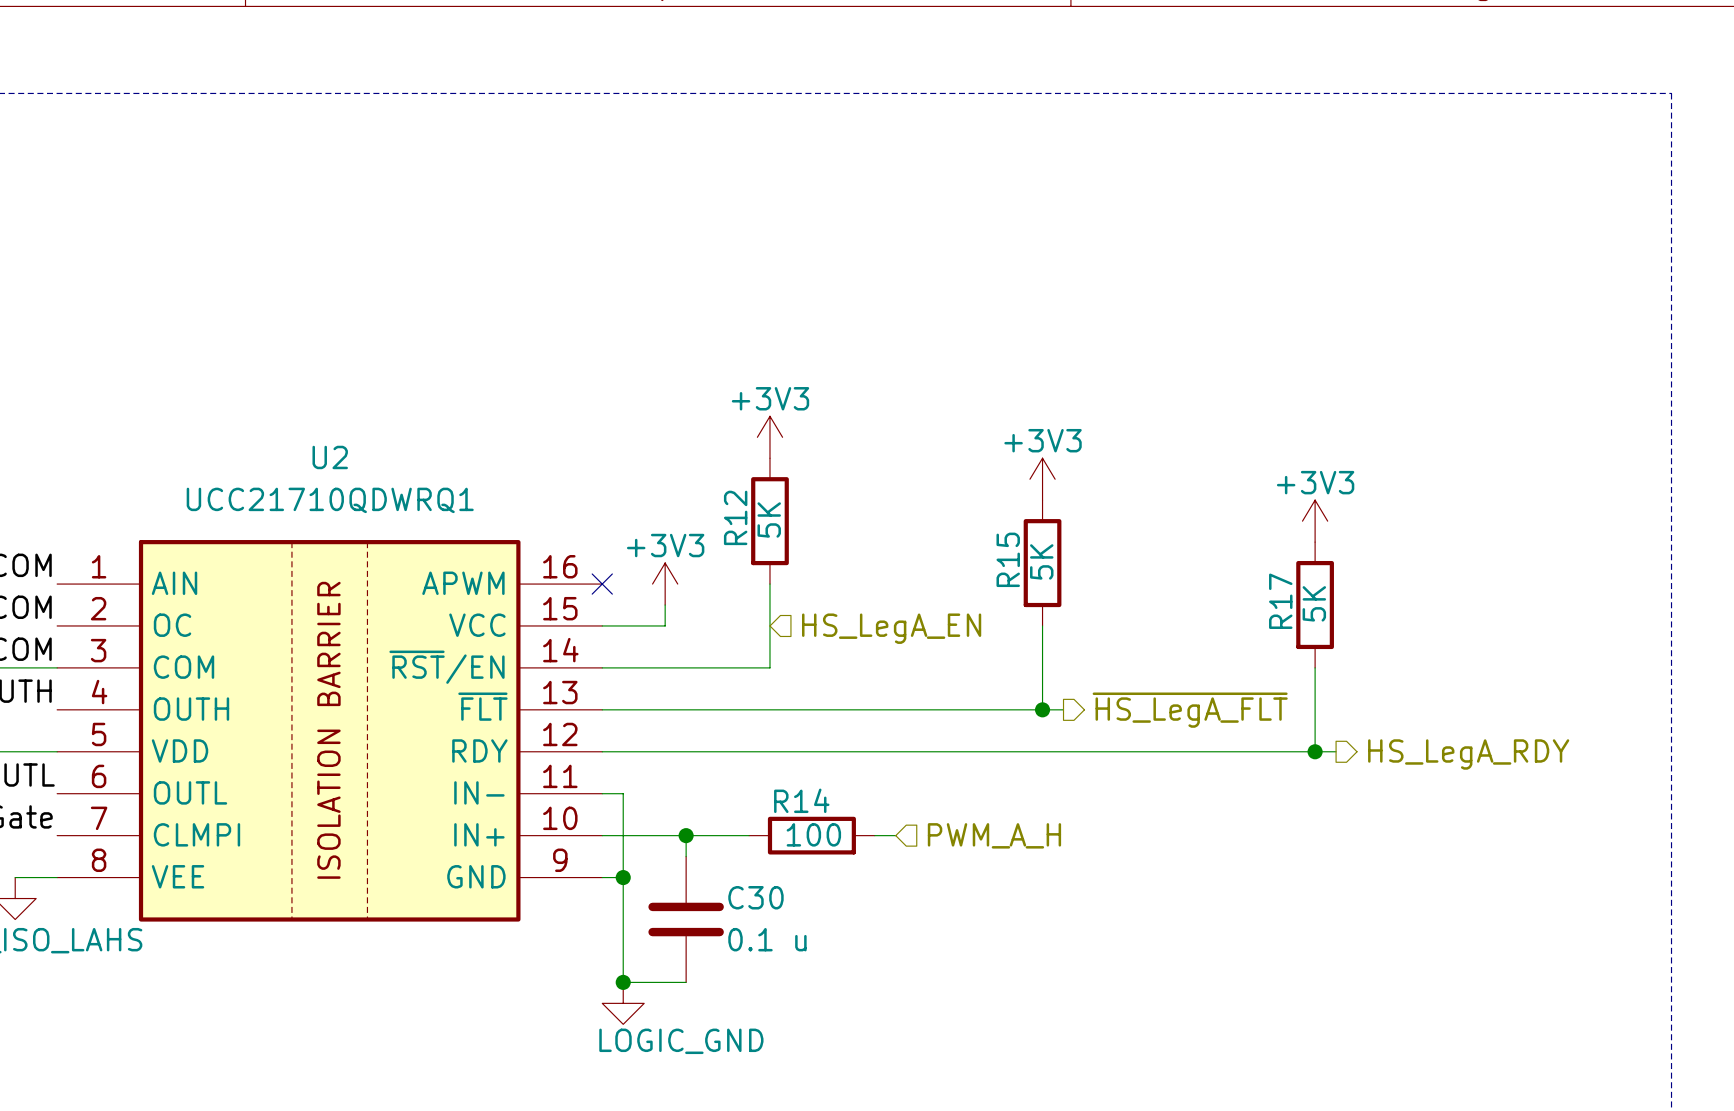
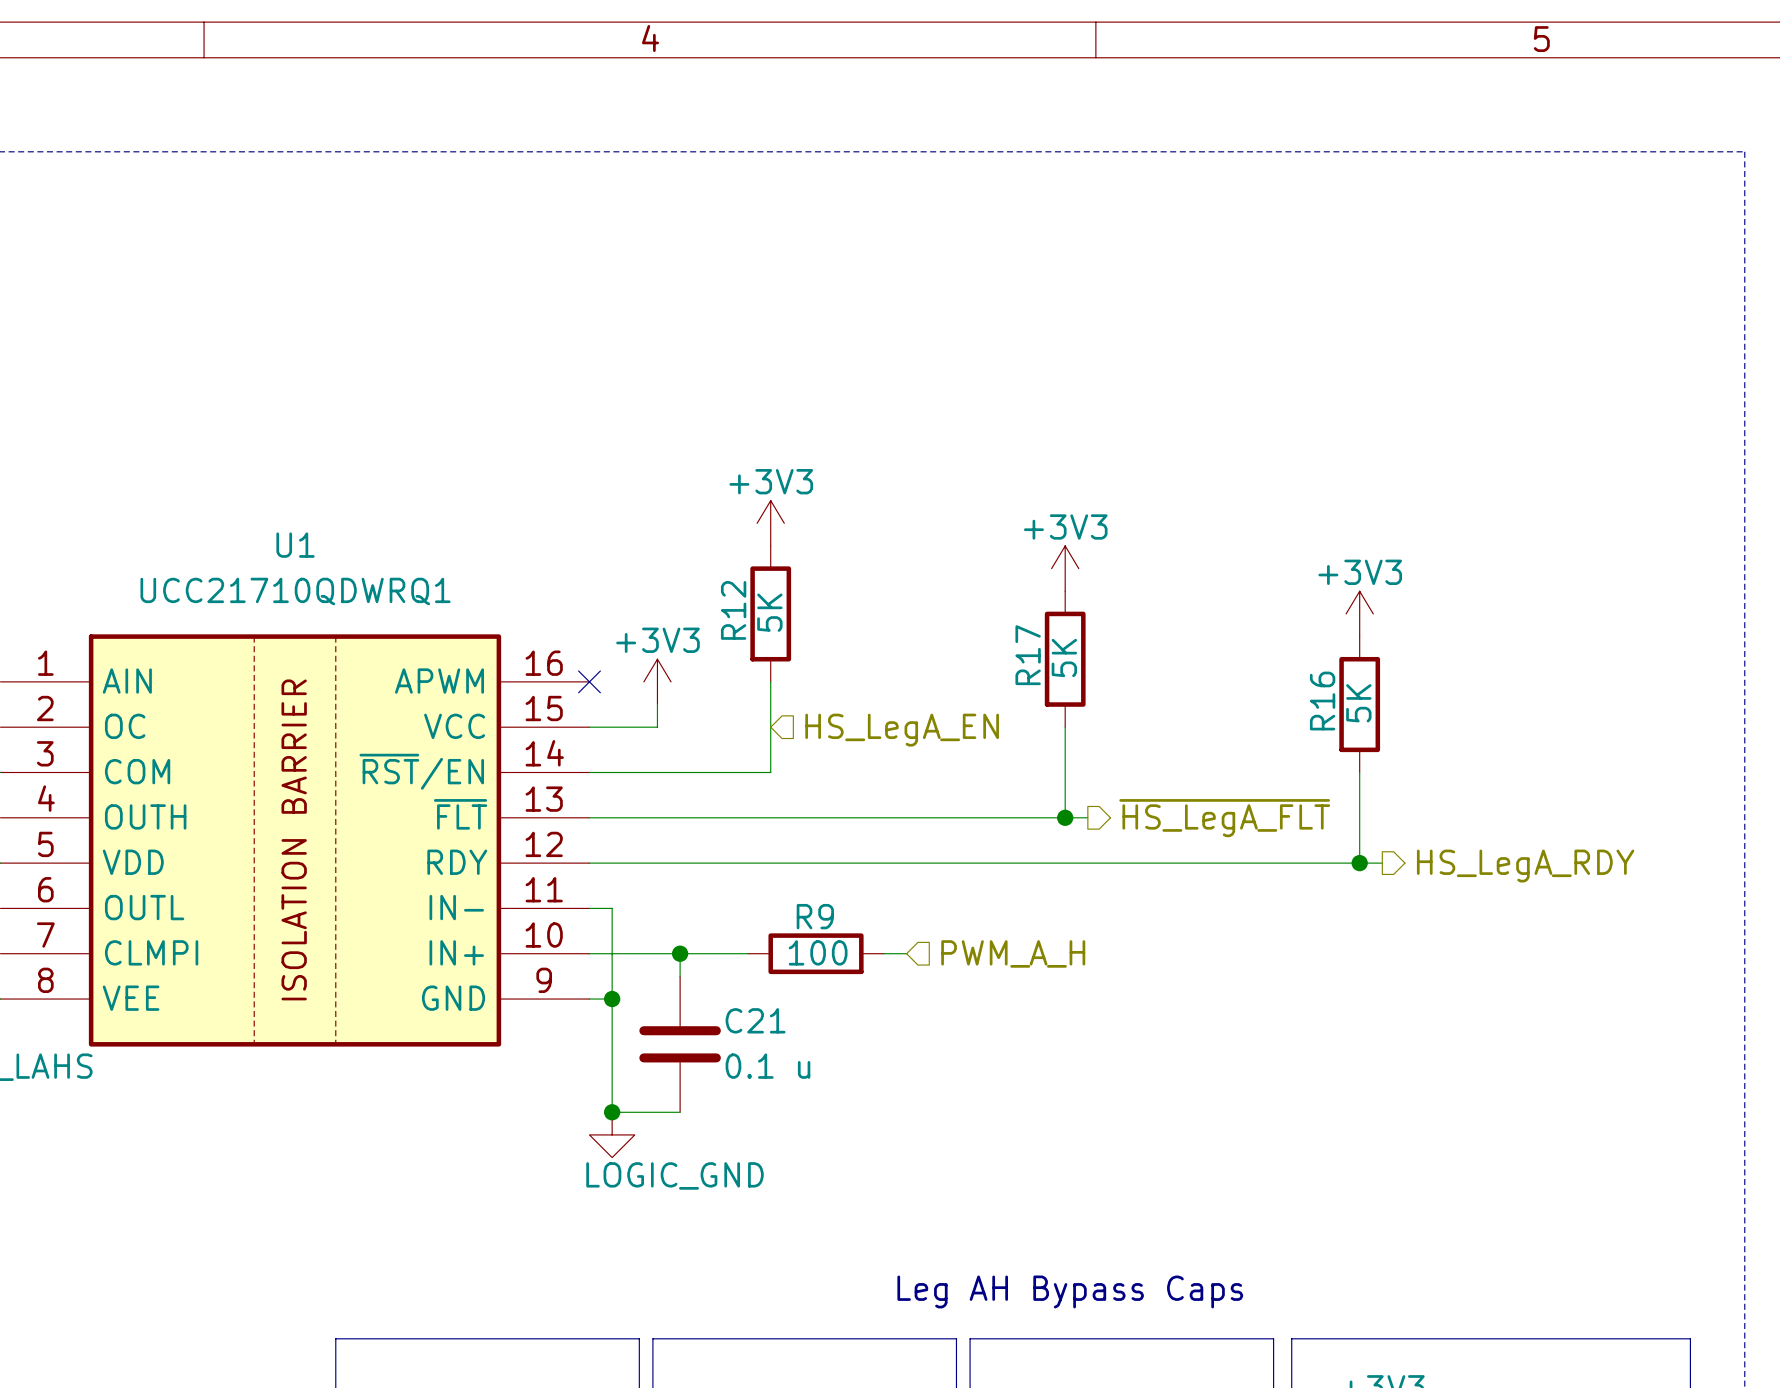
U2 name: U2 (330, 457) -> U1 (295, 545)
R15 name: R15 (1008, 559) -> R17 (1028, 655)
R17 name: R17 (1280, 601) -> R16 (1322, 701)
R14 name: R14 (801, 800) -> R9 (815, 916)
C30 name: C30 (755, 897) -> C21 (755, 1020)

